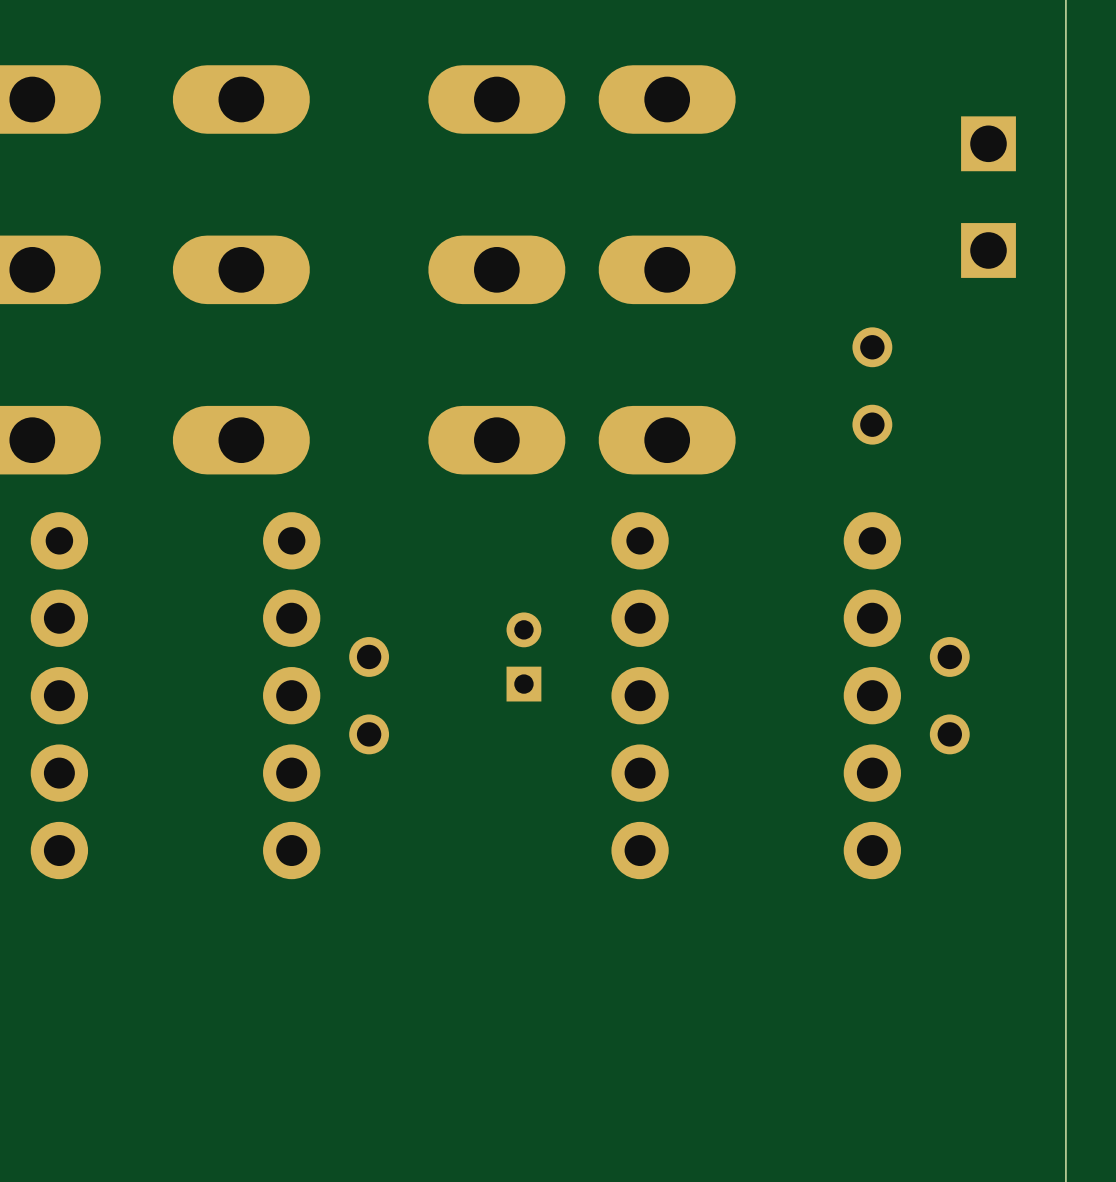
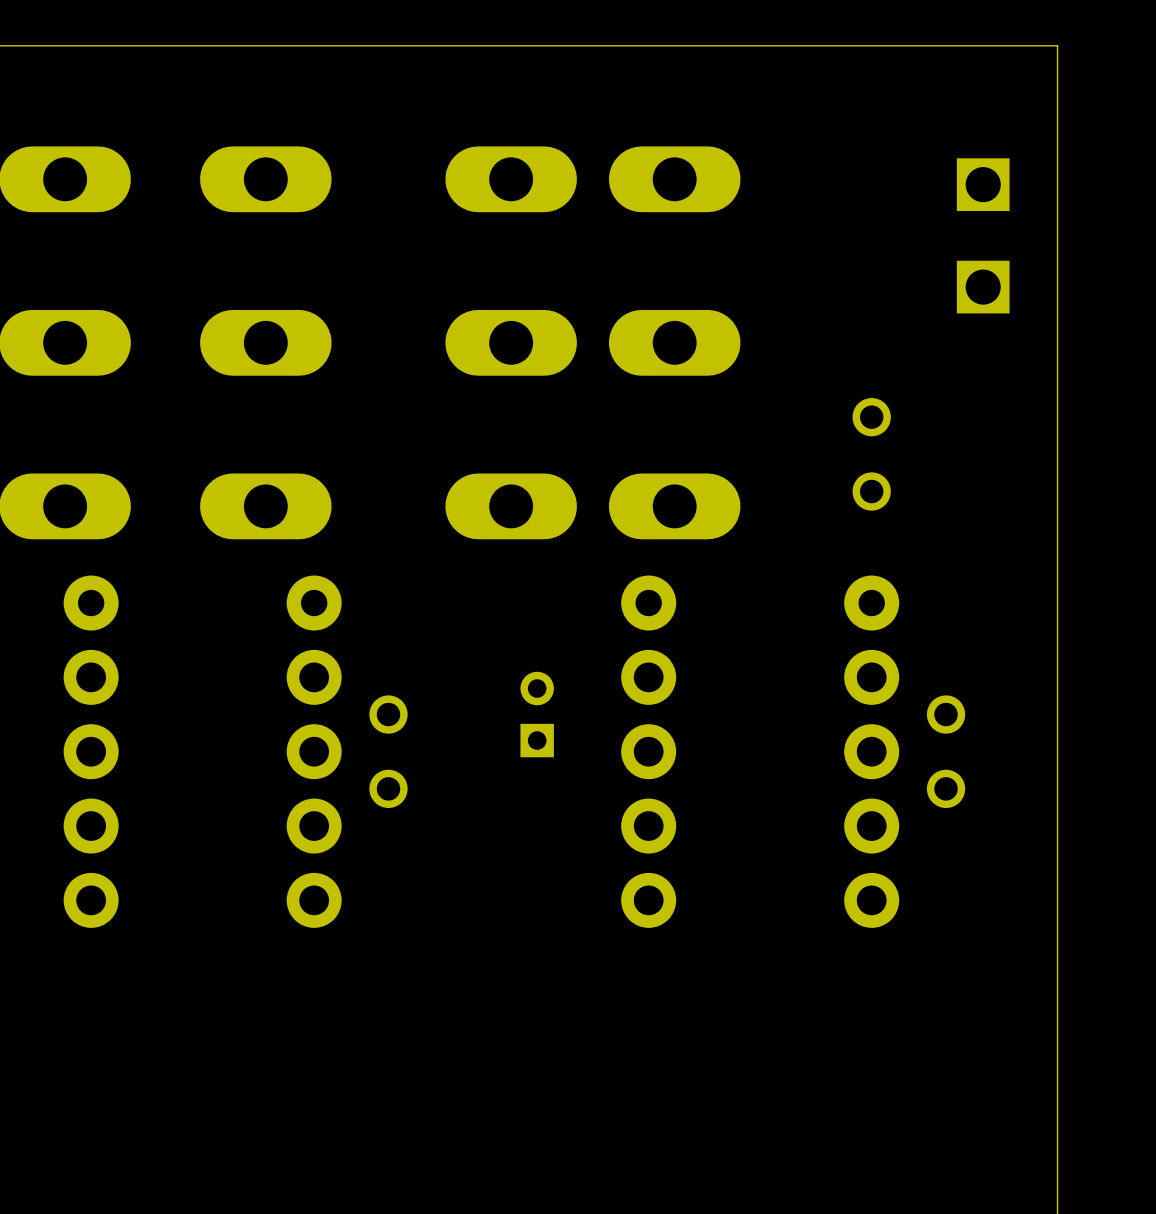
part position: (988, 197) -> (983, 235)

